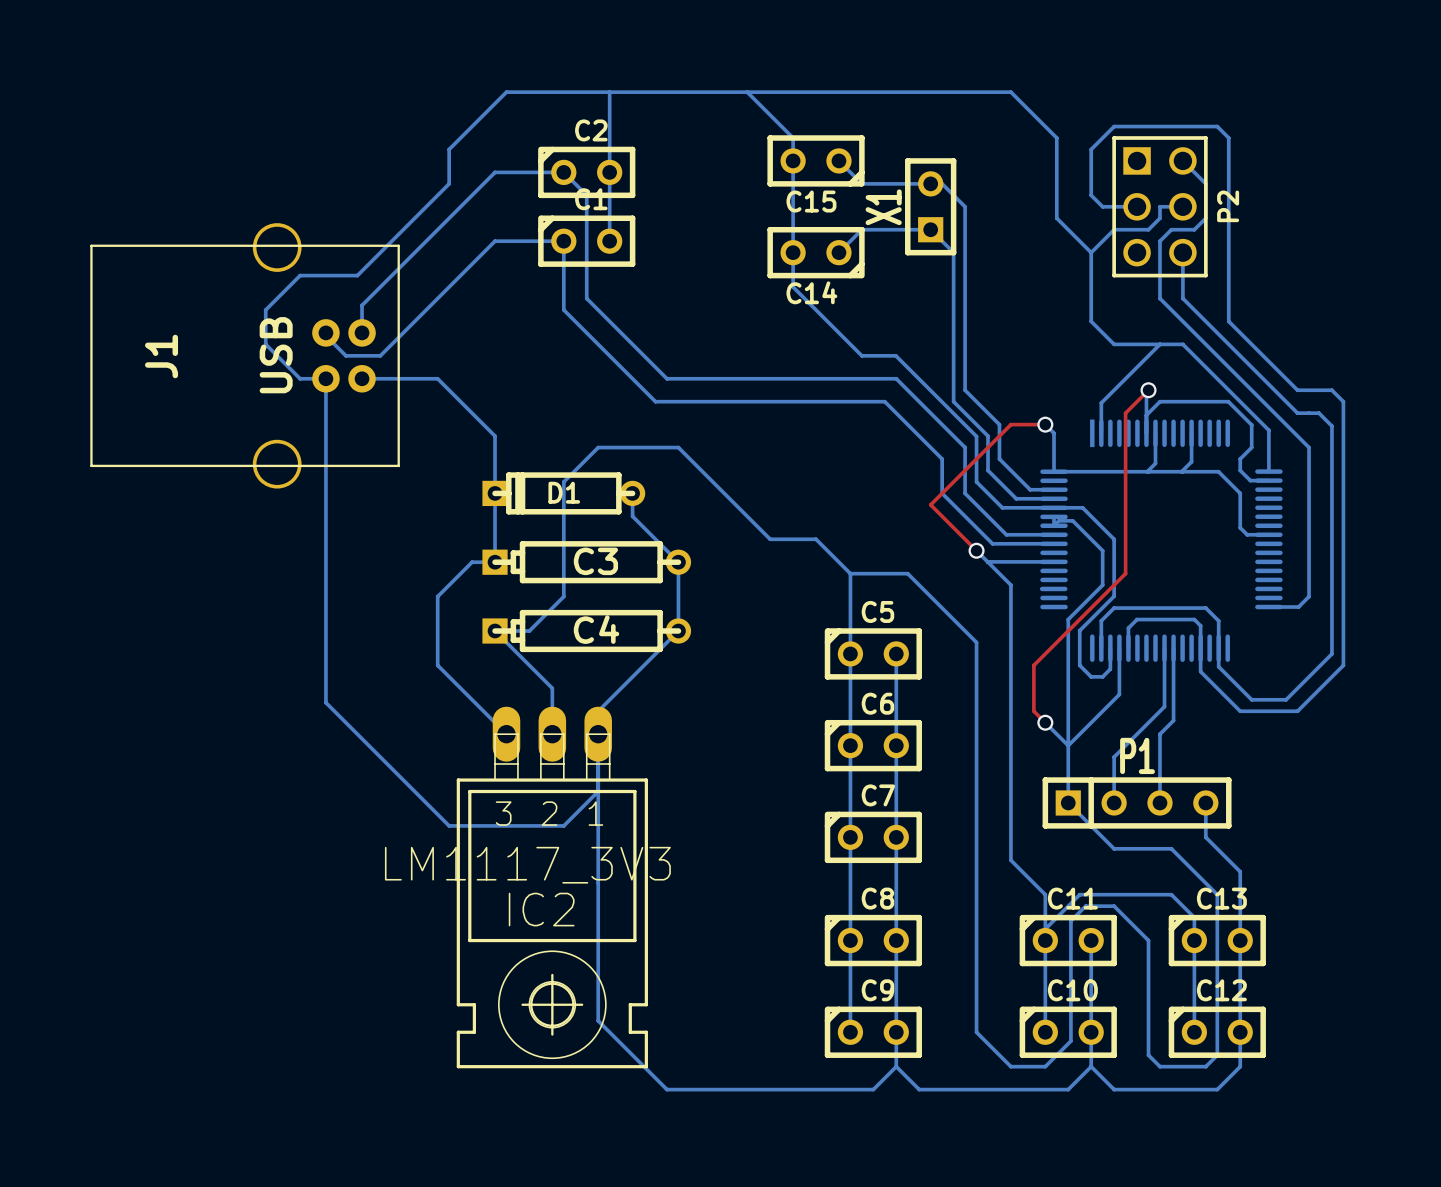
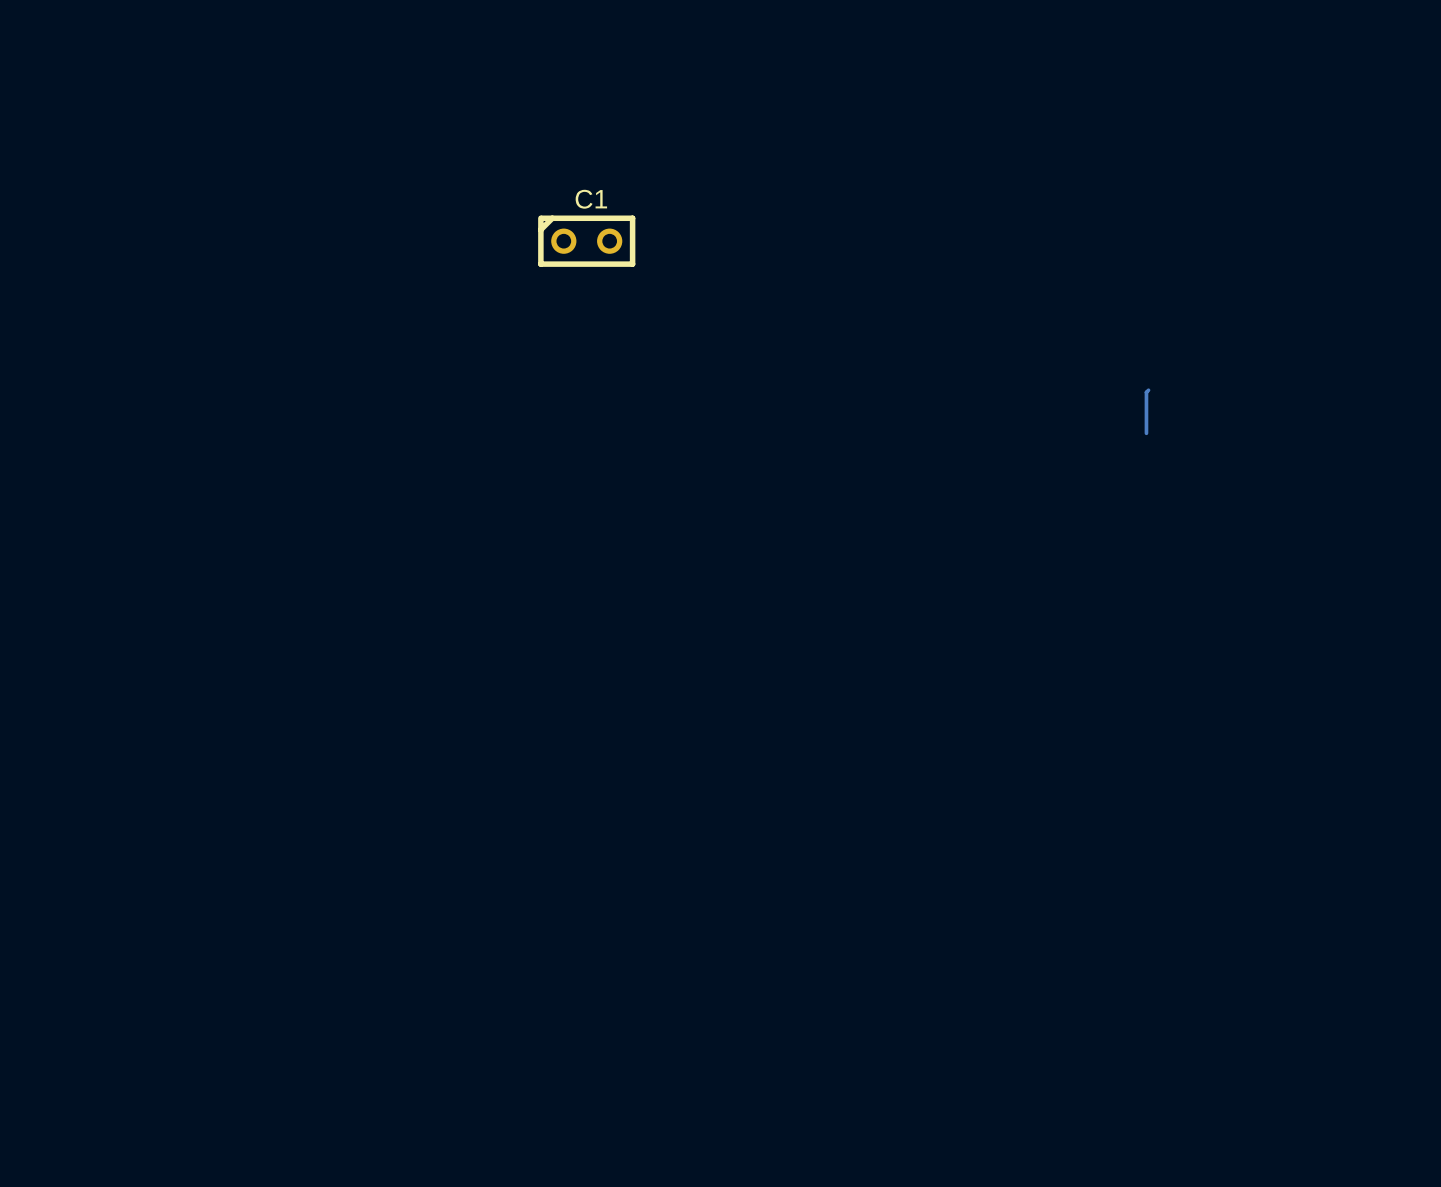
bottom track: (609, 92) (609, 241) -> none
bottom track: (747, 92) (793, 138) (793, 287) (861, 355) (895, 355) (976, 436) (976, 481) (1002, 507) (1082, 507) (1114, 539) (1114, 596) (1079, 630) (1079, 665) (1091, 676) (1102, 676) (1110, 669) (1110, 648) -> none
C15: (816, 160) -> none
bottom track: (838, 160) (861, 183) (942, 183) (965, 206) (965, 390) (999, 424) (999, 459) (1030, 489) (1054, 489) -> none
bottom track: (1182, 160) (1205, 183) (1205, 218) (1194, 229) (1171, 229) (1159, 241) (1159, 298) (1309, 447) (1309, 596) (1298, 607) (1268, 607) -> none
C2: (586, 172) -> none
X1: (930, 206) -> none
bottom track: (1137, 206) (1102, 206) (1091, 195) (1091, 149) (1114, 126) (1217, 126) (1228, 138) (1228, 321) (1297, 390) (1331, 390) (1343, 401) (1343, 665) (1297, 711) (1240, 711) (1200, 671) (1200, 625) (1194, 619) (1137, 619) (1128, 628) (1128, 648) -> none
P2: (1159, 206) -> none
bottom track: (1182, 206) (1159, 206) (1159, 218) (1148, 229) (1114, 229) (1091, 252) -> none
C14: (816, 252) -> none
bottom track: (838, 252) (861, 229) (930, 229) (953, 252) (953, 401) (988, 436) (988, 470) (1016, 498) (1054, 498) -> none
bottom track: (1091, 252) (1091, 321) (1114, 344) (1182, 344) (1268, 430) (1268, 471) -> none
bottom track: (1091, 252) (1056, 218) (1056, 138) (1010, 92) (506, 92) (449, 149) (449, 183) (357, 275) (300, 275) (265, 309) (265, 344) (300, 378) (325, 378) (325, 702) (449, 825) (563, 825) (598, 791) -> none
bottom track: (1182, 252) (1182, 298) (1297, 413) (1318, 413) (1331, 426) (1331, 653) (1286, 699) (1251, 699) (1218, 666) (1218, 620) (1205, 608) (1114, 608) (1101, 620) (1101, 648) -> none
bottom track: (325, 332) (325, 335) (345, 355) (380, 355) (495, 241) (563, 241) (563, 309) (655, 401) (884, 401) (942, 459) (942, 493) (992, 543) (1054, 543) -> none
bottom track: (362, 332) (362, 305) (495, 172) (563, 172) (586, 195) (586, 298) (667, 378) (896, 378) (965, 447) (965, 493) (1006, 534) (1054, 534) -> none
bottom track: (1159, 344) (1101, 403) (1101, 433) -> none
J1: USB (245, 355) -> none
bottom track: (362, 378) (437, 378) (495, 436) (495, 562) (472, 562) (437, 596) (437, 665) (506, 734) -> none
top track: (1148, 390) (1125, 413) (1125, 573) (1033, 665) (1033, 711) (1045, 722) -> none
via: (1148, 390) -> none
bottom track: (1146, 415) (1159, 401) (1228, 401) (1251, 425) (1251, 447) (1240, 459) (1240, 470) (1250, 480) (1268, 480) -> none
bottom track: (1045, 424) (1054, 433) (1054, 471) (1218, 471) (1240, 493) (1240, 527) (1247, 534) (1268, 534) -> none
top track: (1045, 424) (1010, 424) (930, 504) (976, 550) -> none
via: (1045, 424) -> none
bottom track: (1155, 433) (1155, 463) (1147, 471) -> none
bottom track: (1191, 433) (1191, 461) (1181, 471) -> none
D1: (563, 493) -> none
bottom track: (632, 493) (632, 516) (678, 562) (678, 631) (598, 711) (598, 1020) (667, 1089) (873, 1089) (896, 1066) -> none
bottom track: (1054, 516) (1054, 525) (1058, 520) (1072, 520) (1102, 550) (1102, 585) (1068, 619) (1068, 802) (1114, 848) (1171, 848) (1217, 894) (1217, 1055) (1205, 1066) (1159, 1066) (1148, 1055) (1148, 940) (1114, 906) (1085, 906) (1070, 920) (1070, 1041) (1045, 1066) (1010, 1066) (976, 1032) (976, 642) (907, 573) (850, 573) -> none
part: (1161, 540) -> none
bottom track: (976, 550) (987, 561) (1054, 561) -> none
via: (976, 550) -> none
C3: (586, 562) -> none
bottom track: (988, 562) (1010, 585) (1010, 860) (1045, 894) (1045, 1032) -> none
bottom track: (850, 573) (816, 539) (770, 539) (678, 447) (598, 447) (563, 481) (563, 596) (529, 631) (495, 631) (552, 688) (552, 734) -> none
bottom track: (850, 573) (850, 1032) -> none
C4: (586, 631) -> none
bottom track: (1119, 648) (1119, 694) (1068, 745) (1045, 722) -> none
bottom track: (1164, 648) (1164, 706) (1114, 757) (1114, 802) -> none
bottom track: (1173, 648) (1173, 720) (1159, 734) (1159, 802) -> none
C5: (873, 653) -> none
bottom track: (896, 653) (896, 1066) -> none
via: (1045, 722) -> none
C6: (873, 745) -> none
P1: (1137, 802) -> none
bottom track: (1205, 802) (1205, 837) (1240, 871) (1240, 1066) (1217, 1089) (1114, 1089) (1091, 1066) -> none
C7: (873, 837) -> none
IC2: LM1117_3V3 (552, 887) -> none
bottom track: (1045, 929) (1079, 894) (1171, 894) (1194, 917) (1194, 1032) -> none
C8: (873, 940) -> none
C11: (1068, 940) -> none
bottom track: (1091, 940) (1091, 1066) -> none
C13: (1217, 940) -> none
C9: (873, 1032) -> none
C10: (1068, 1032) -> none
C12: (1217, 1032) -> none
bottom track: (896, 1066) (919, 1089) (1068, 1089) (1091, 1066) -> none

